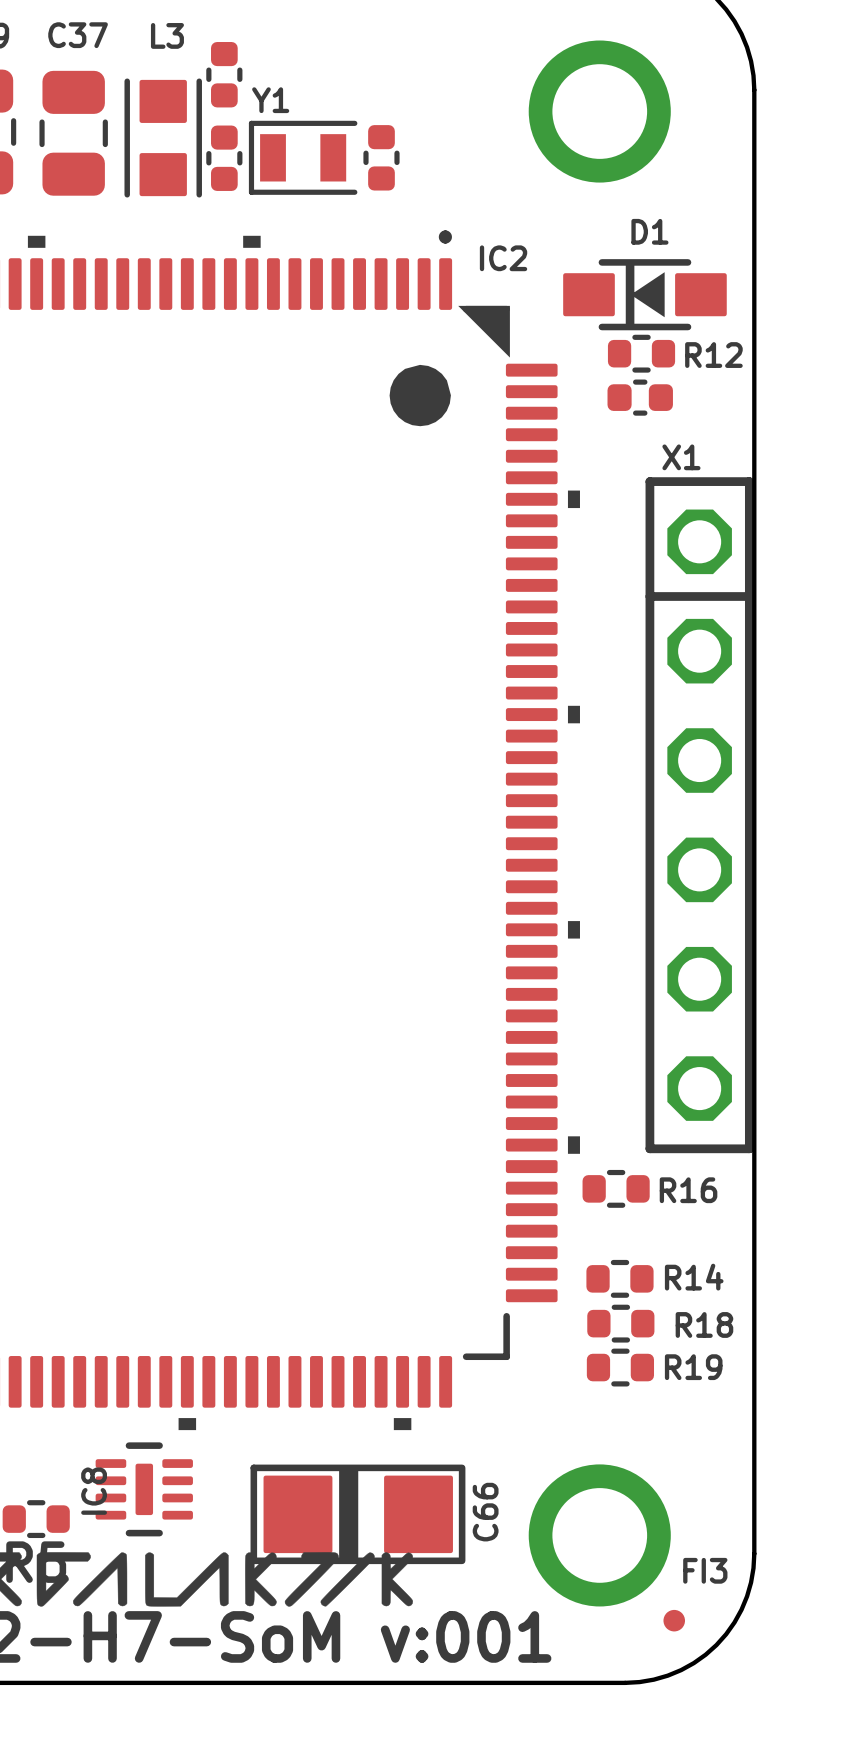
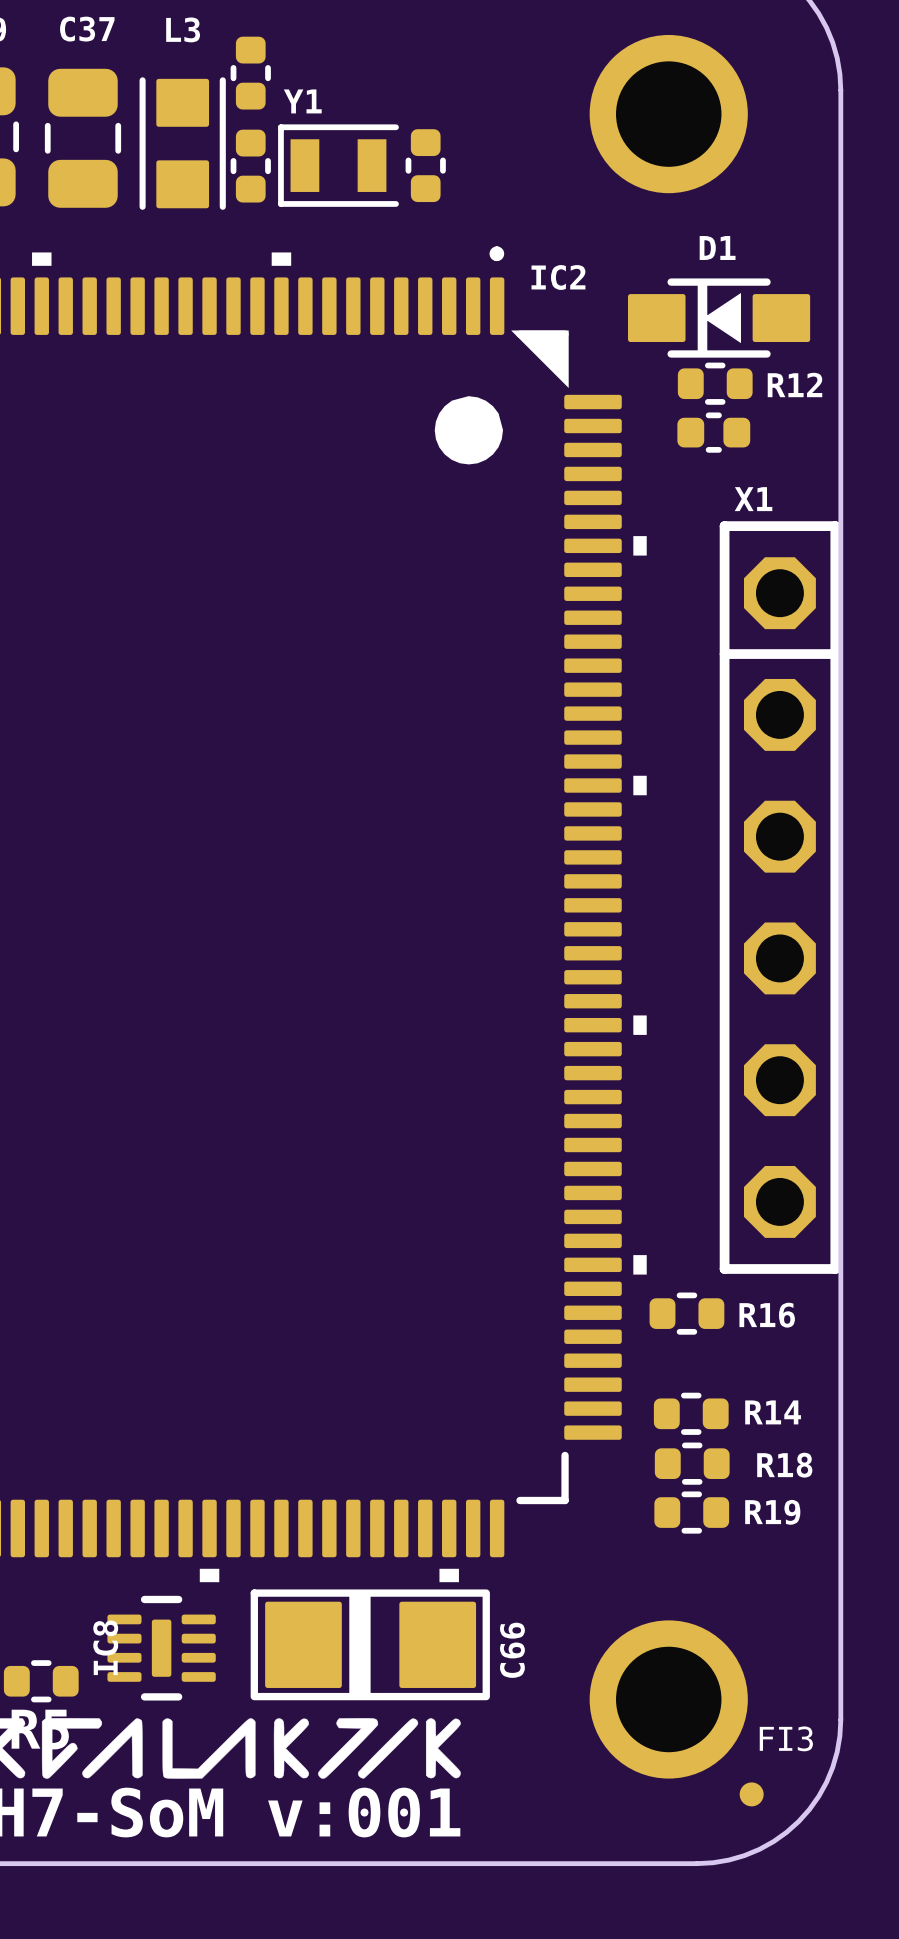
C66 position: (357, 1514) -> (370, 1644)

